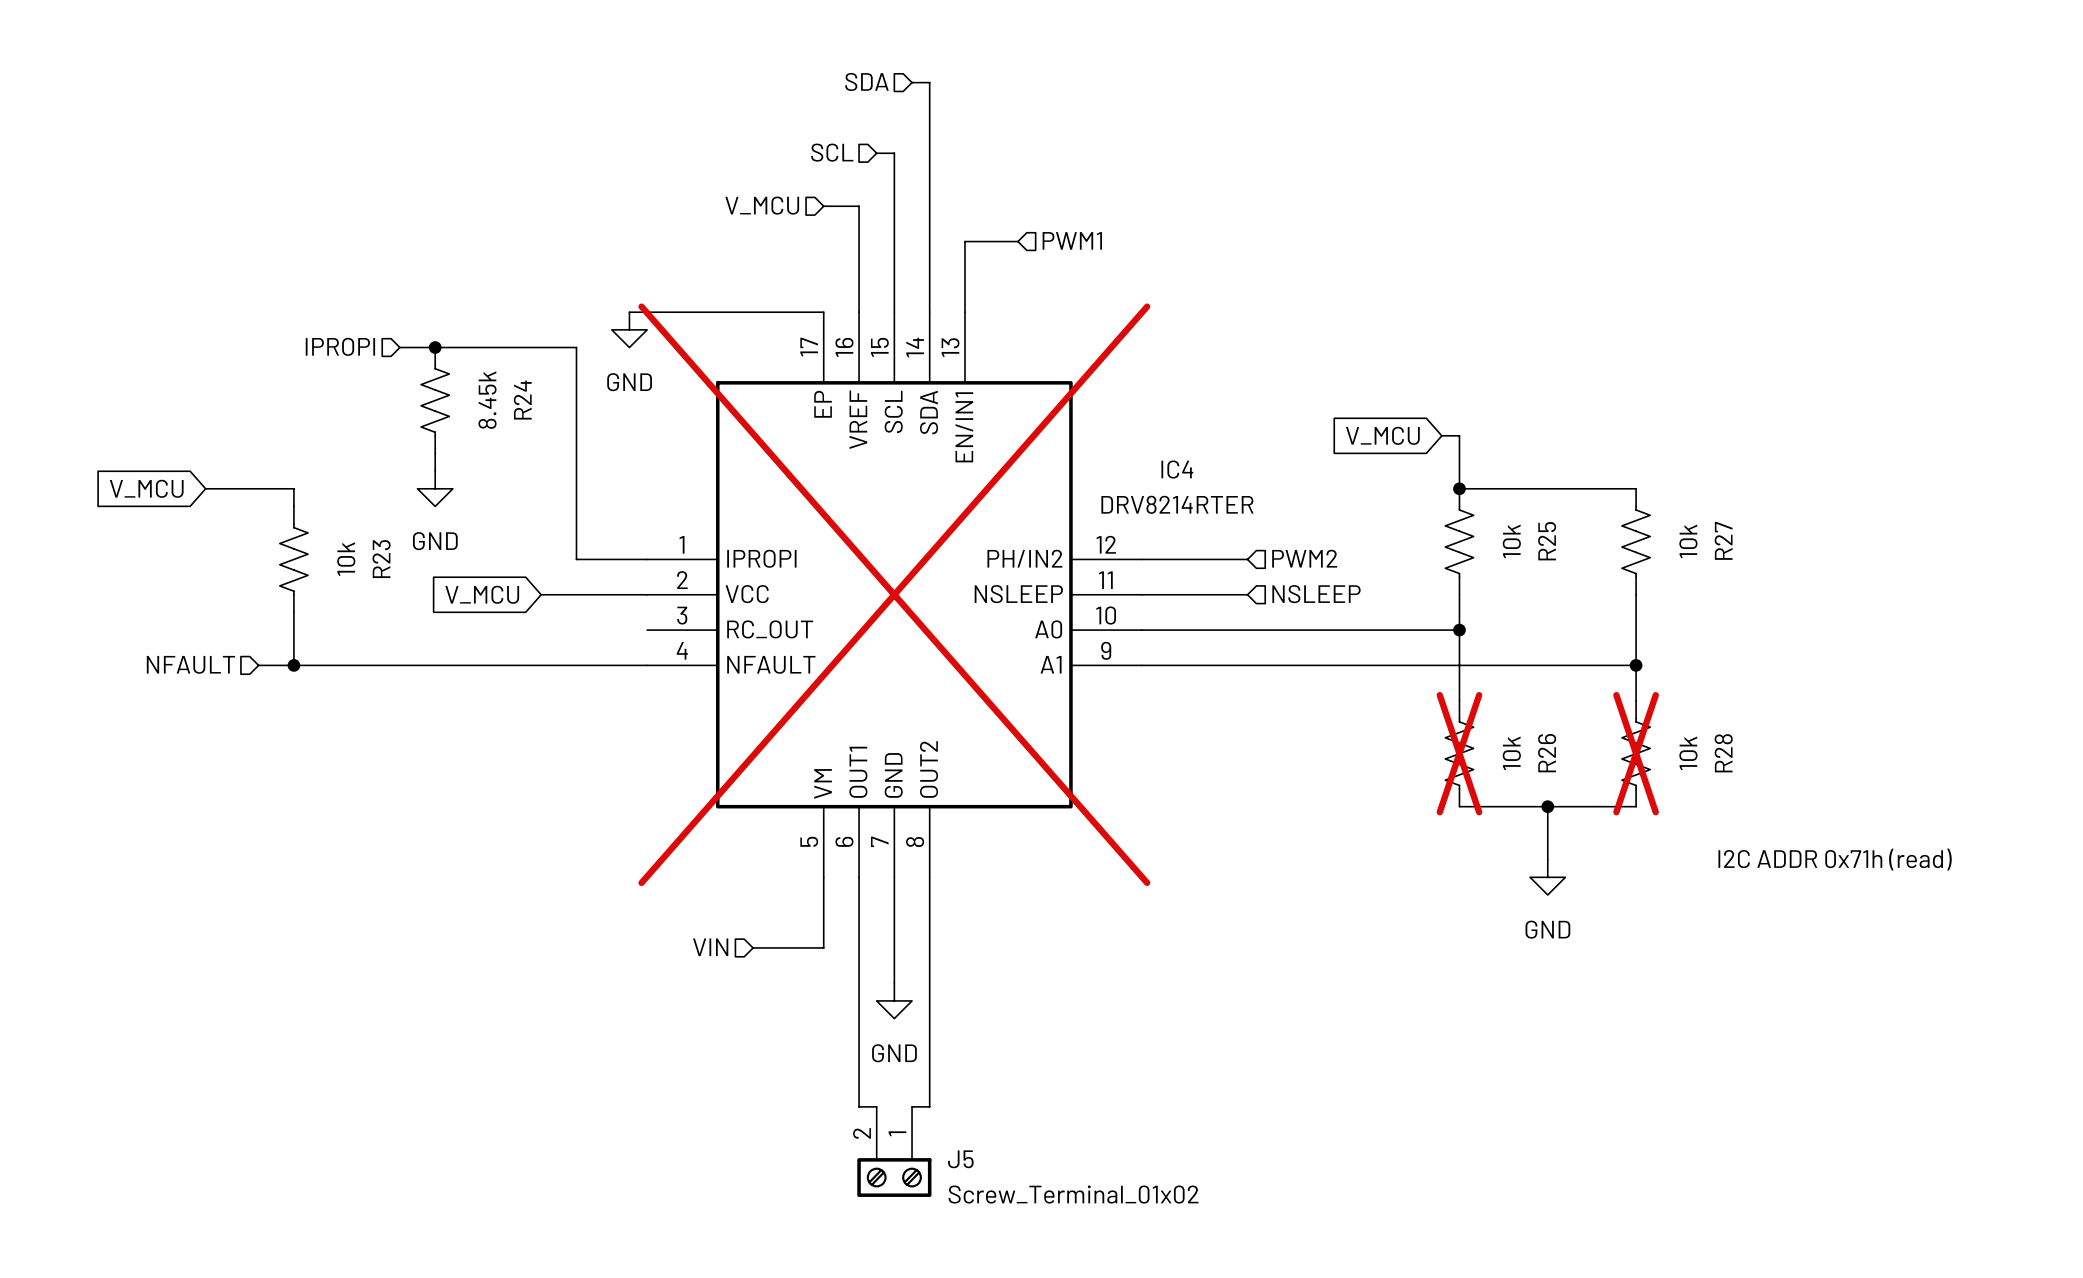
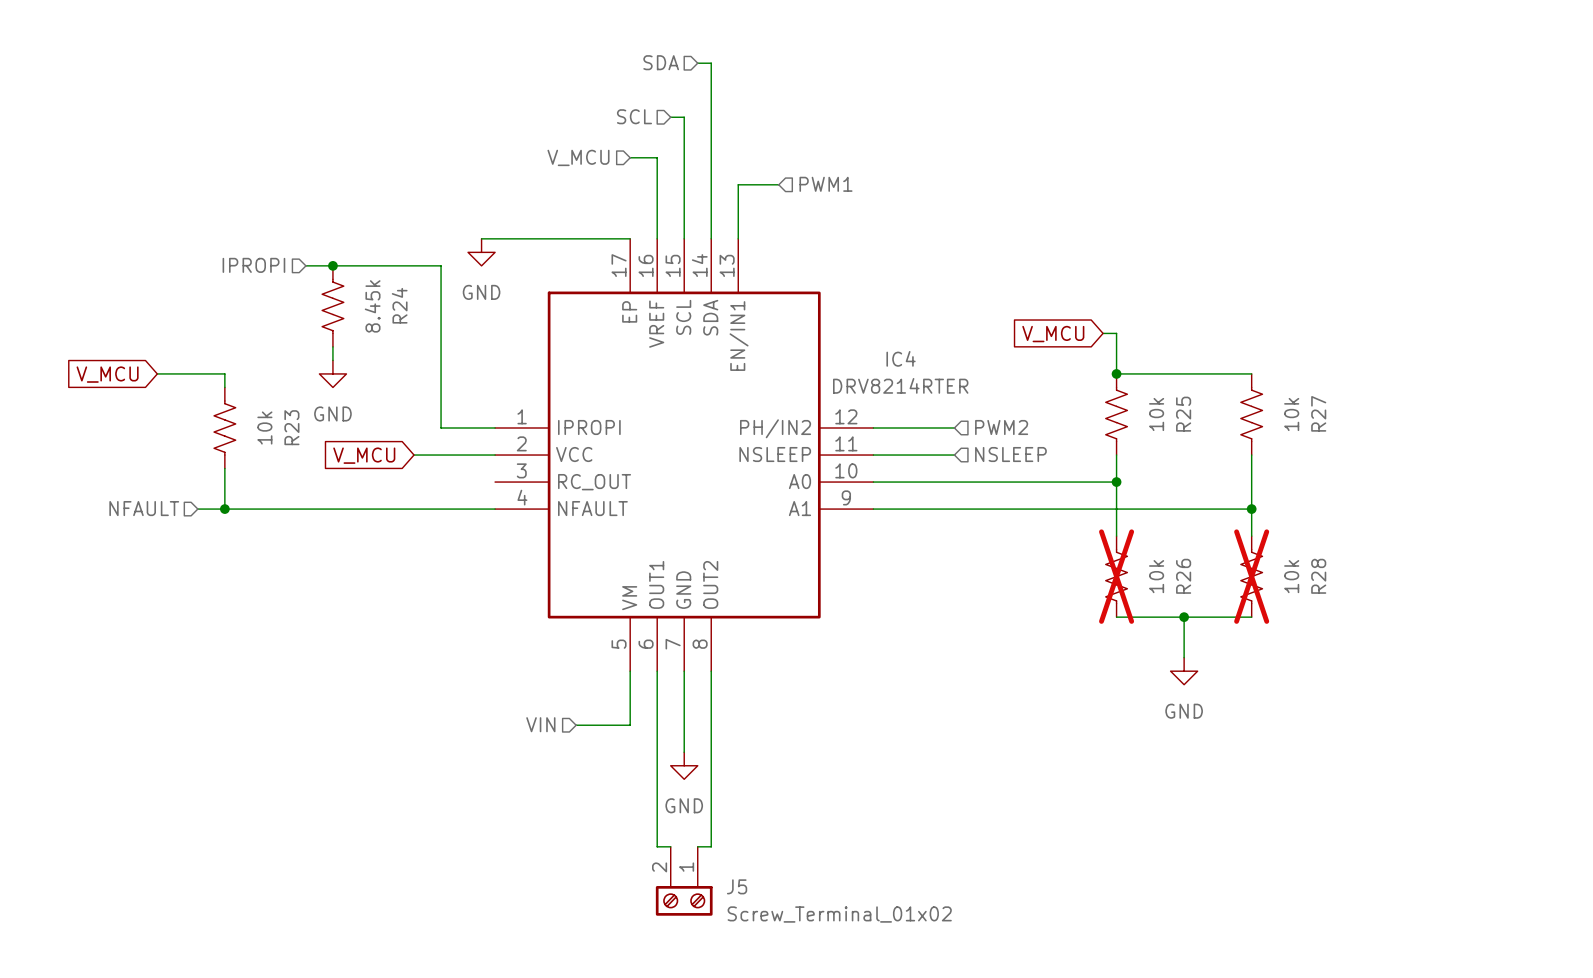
IC4 do-not-place cross: (894, 594) -> none
text: I2C ADDR 0x71h (read) (1835, 859) -> none

